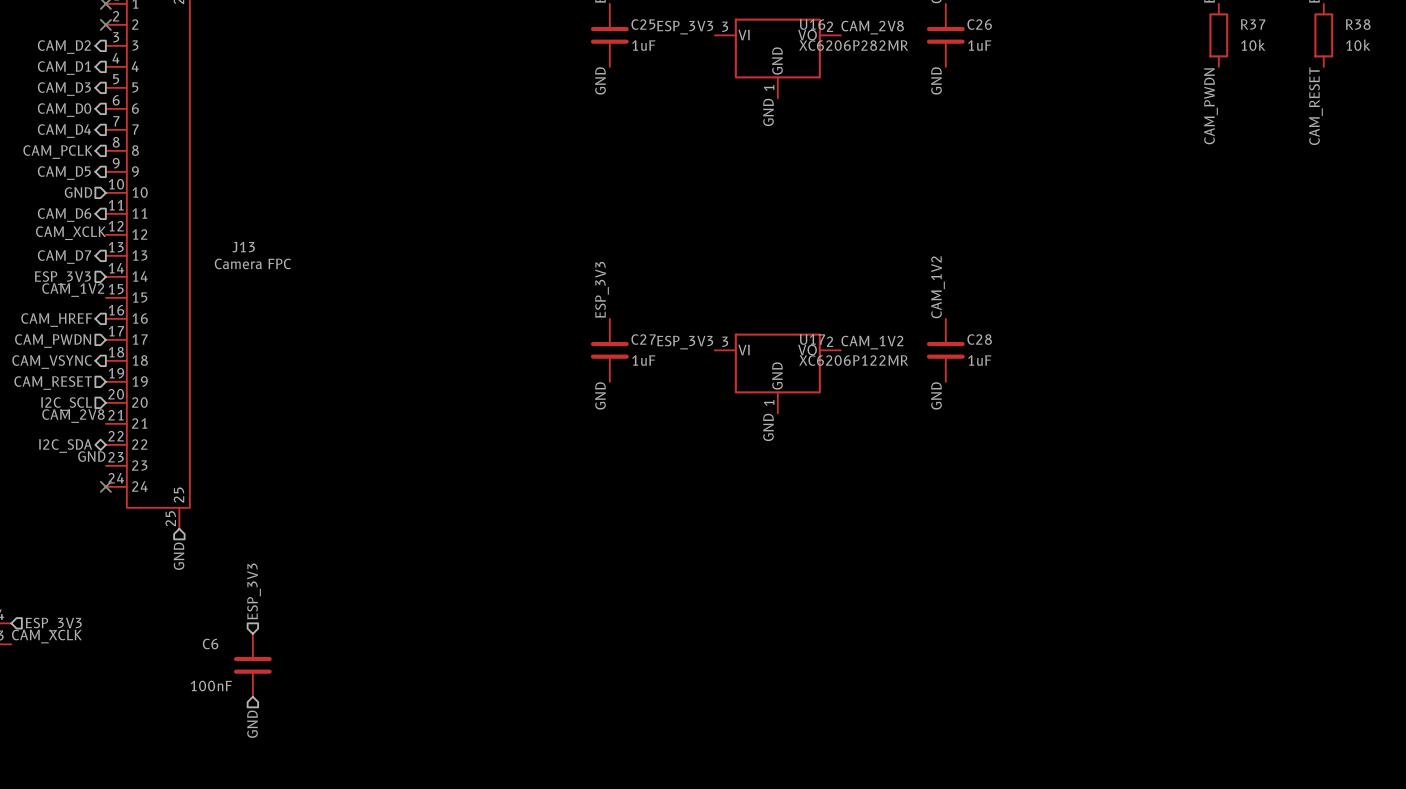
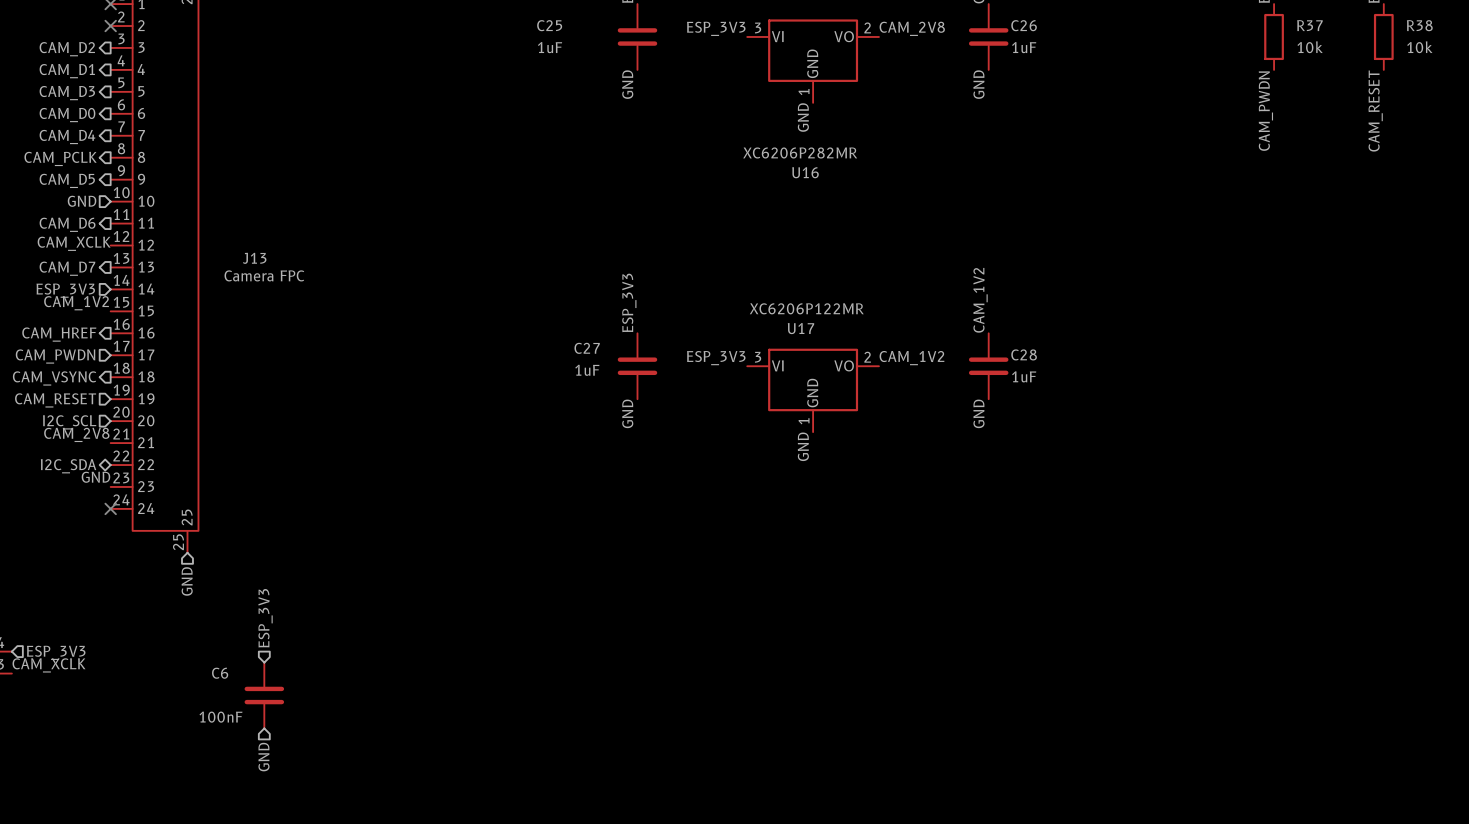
C25 name position: C25 (643, 24) -> C25 (549, 25)
U16 name position: U16 (812, 24) -> U16 (805, 172)
C25 value position: 1uF (643, 45) -> 1uF (550, 47)
U16 value position: XC6206P282MR (853, 45) -> XC6206P282MR (800, 152)
C27 name position: C27 (643, 339) -> C27 (587, 348)
U17 name position: U17 (812, 339) -> U17 (801, 328)
C27 value position: 1uF (643, 360) -> 1uF (587, 370)
U17 value position: XC6206P122MR (853, 360) -> XC6206P122MR (806, 308)

